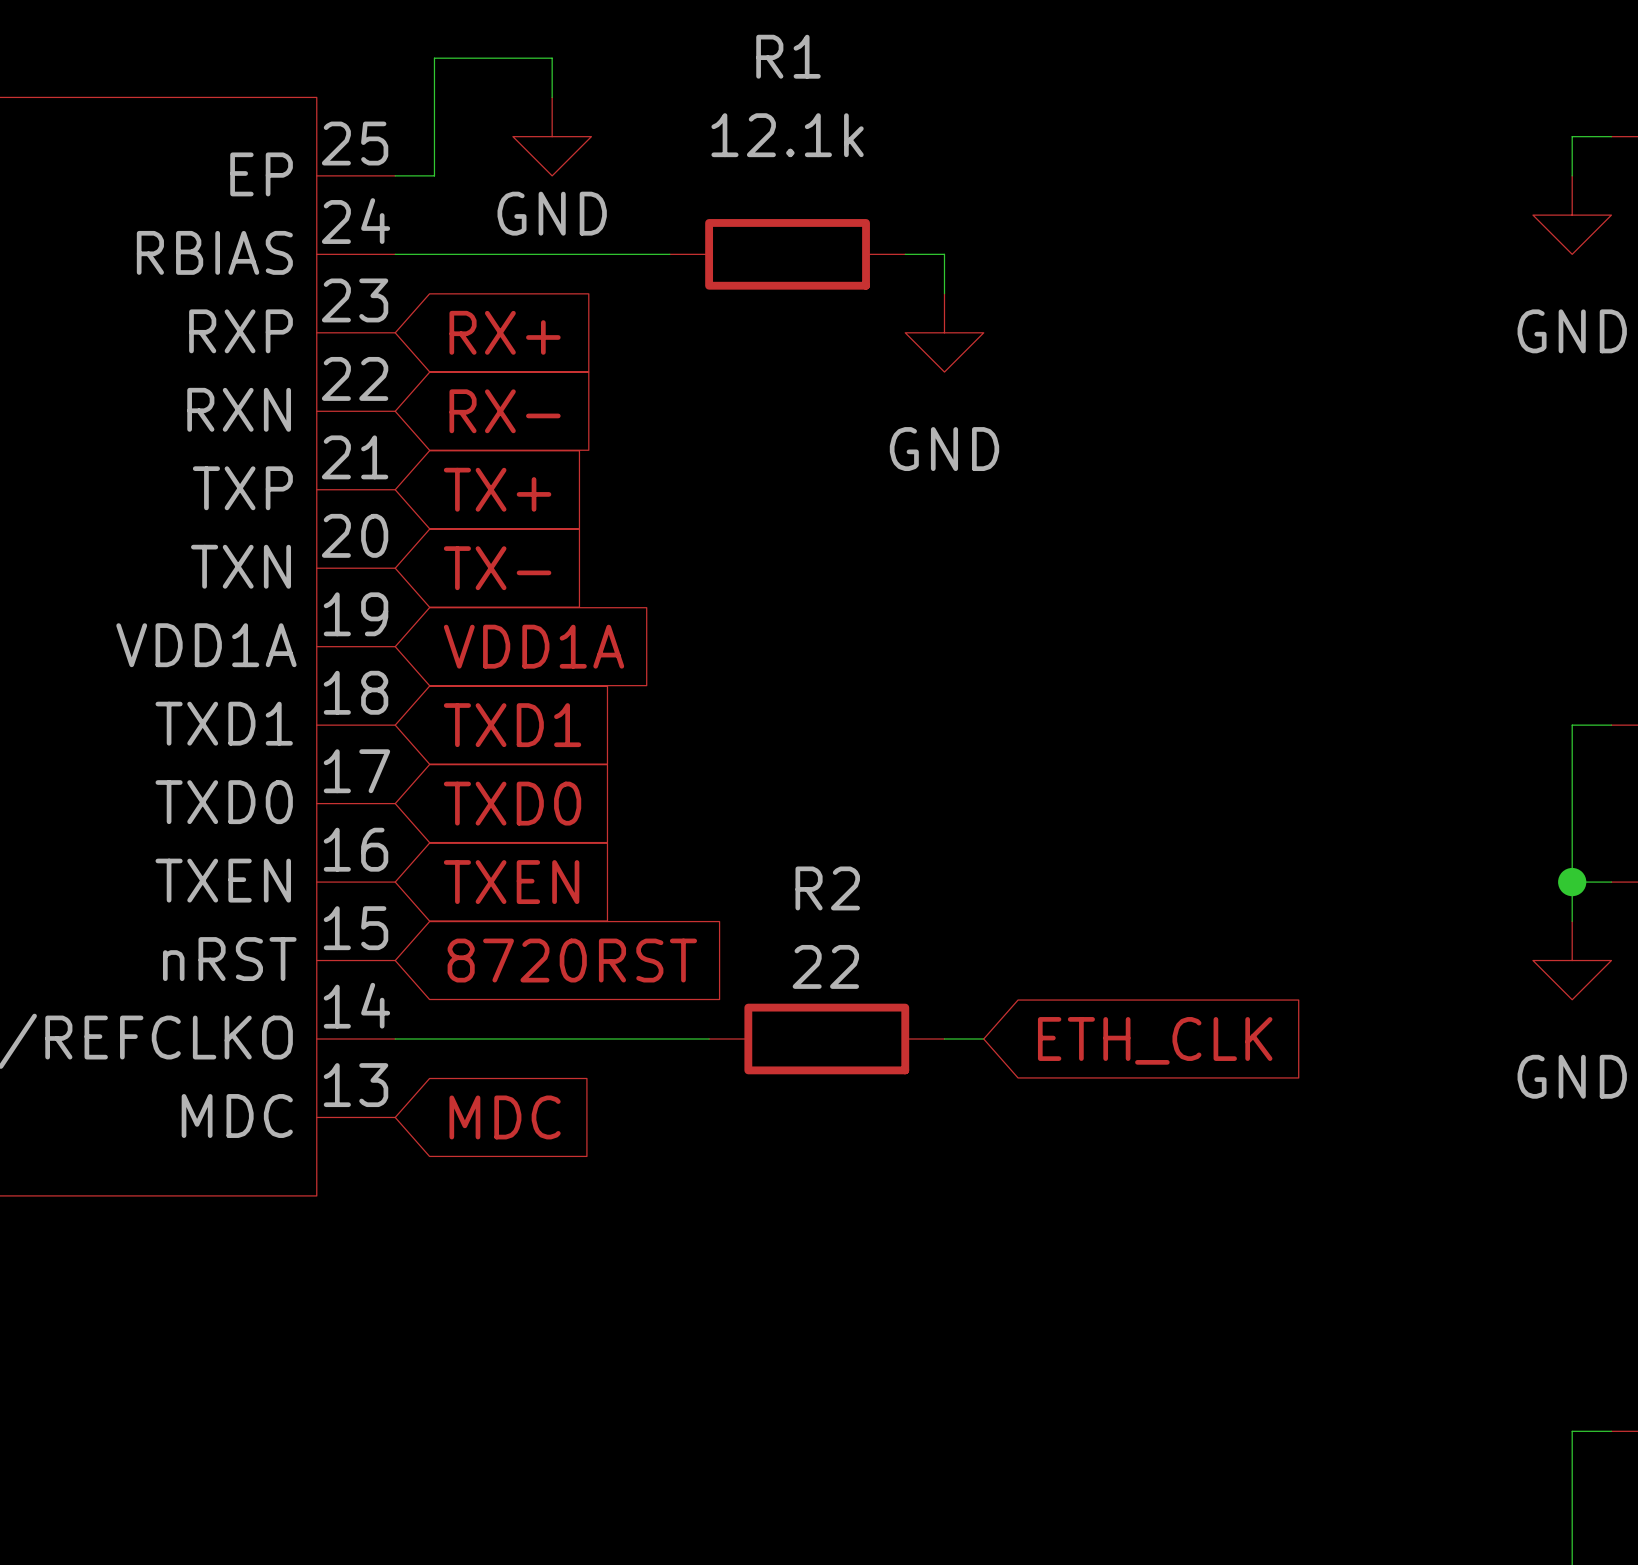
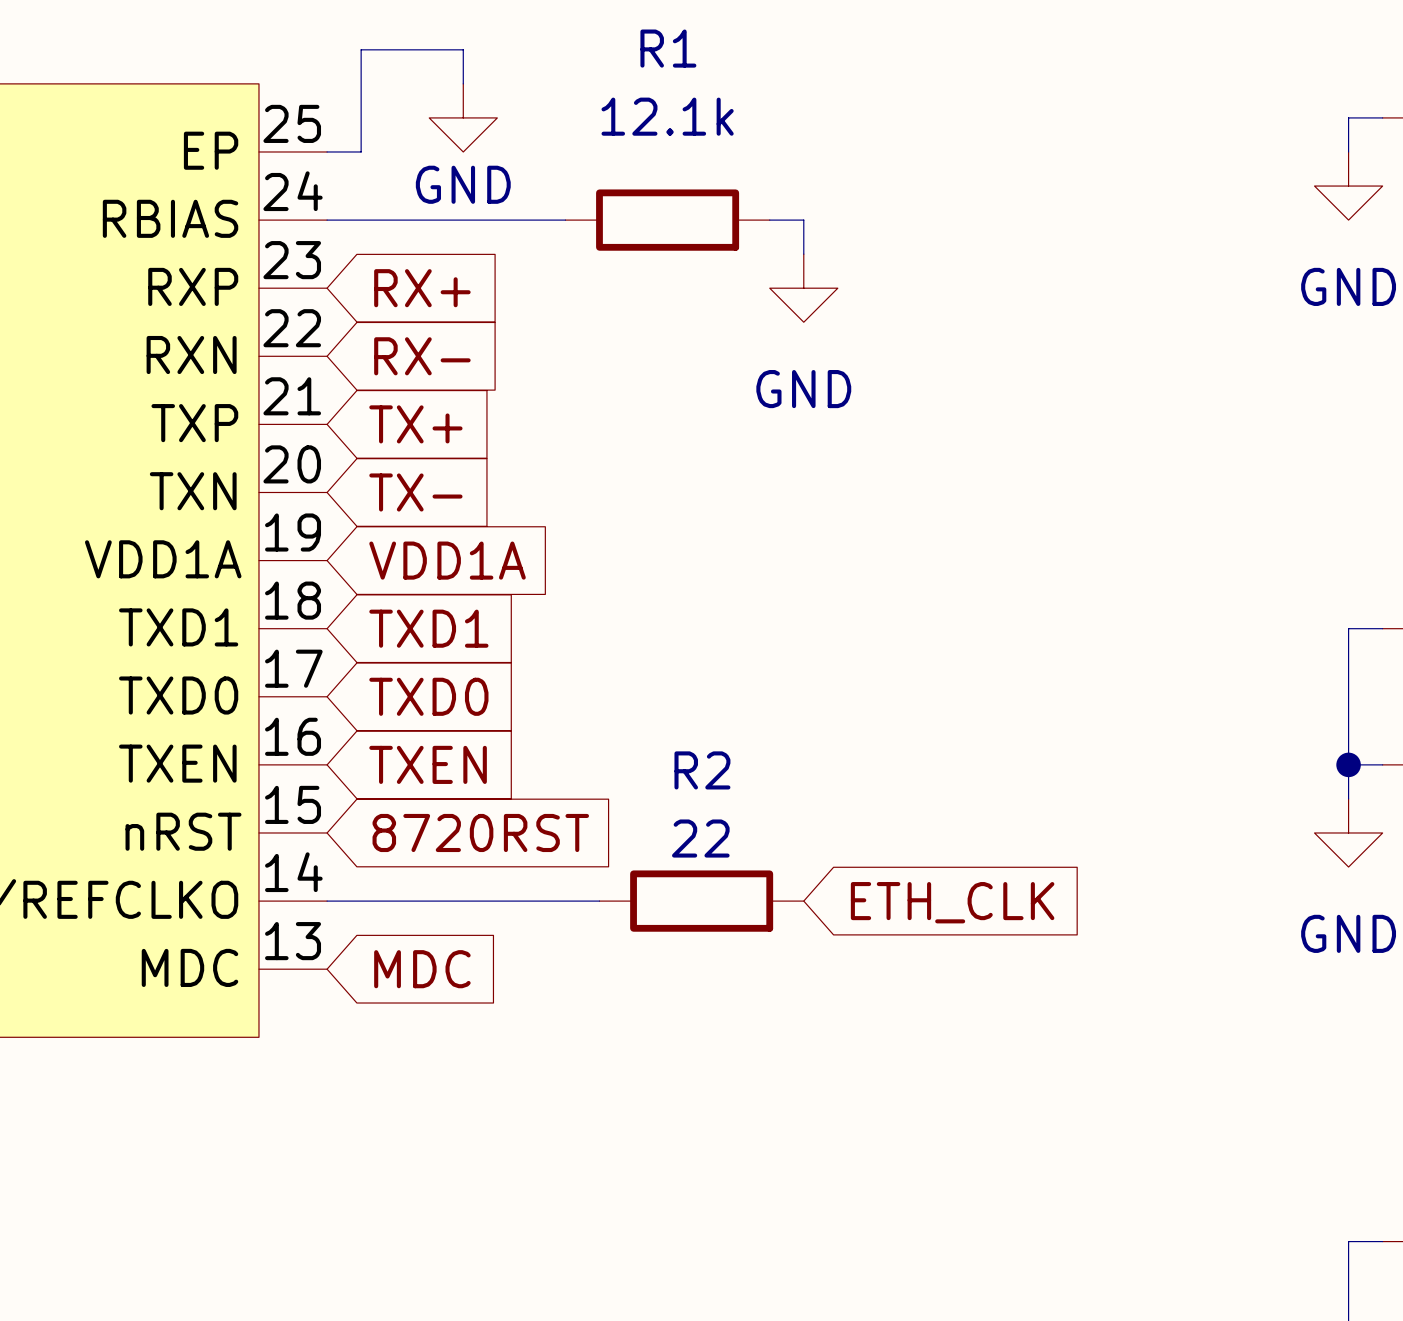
wire: (944, 1038) (983, 1038) -> none
global label position: ETH_CLK (1155, 1040) -> ETH_CLK (952, 902)

